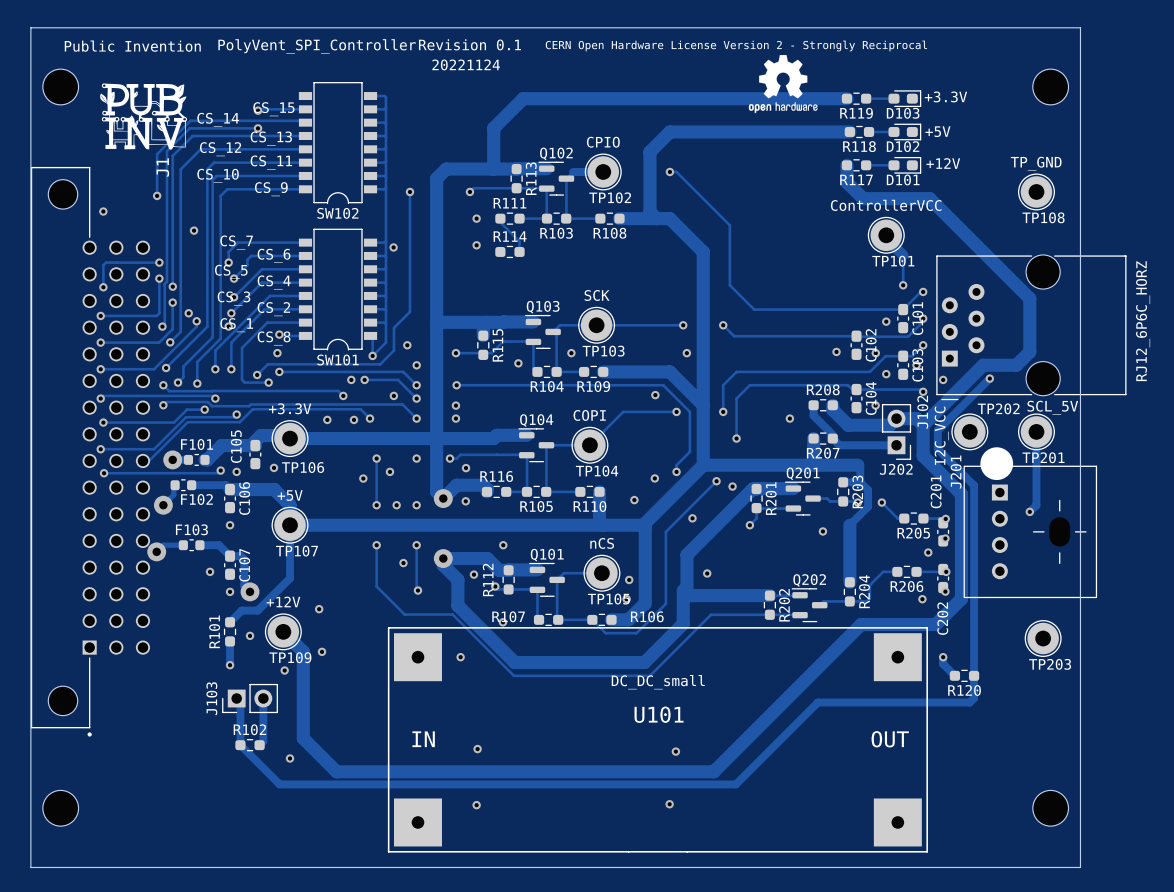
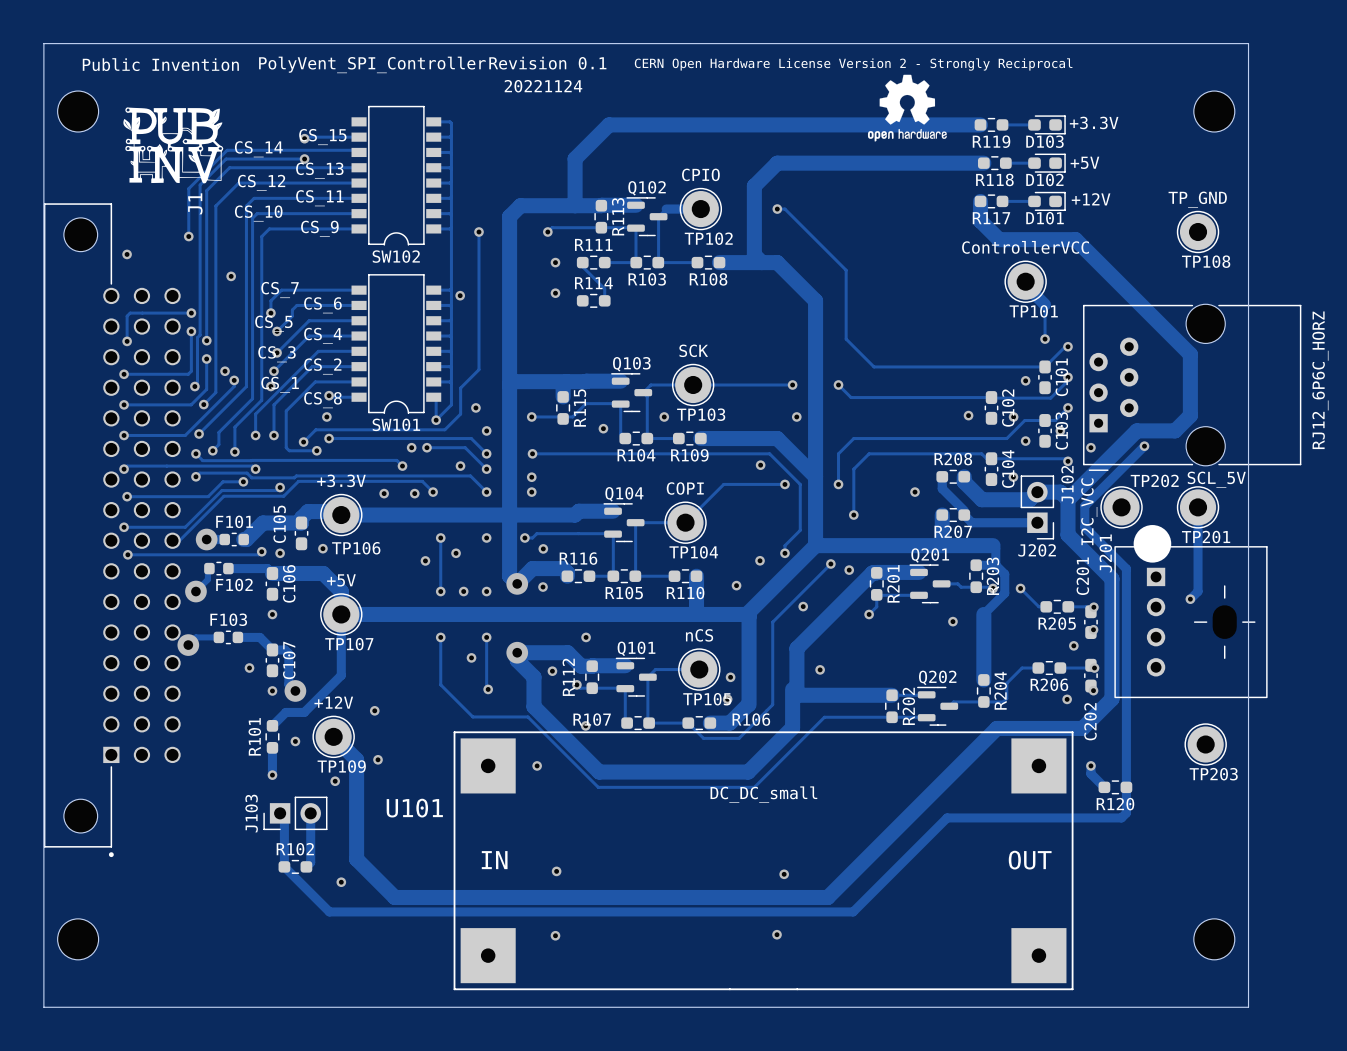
U101 name position: U101 (659, 714) -> U101 (414, 808)

